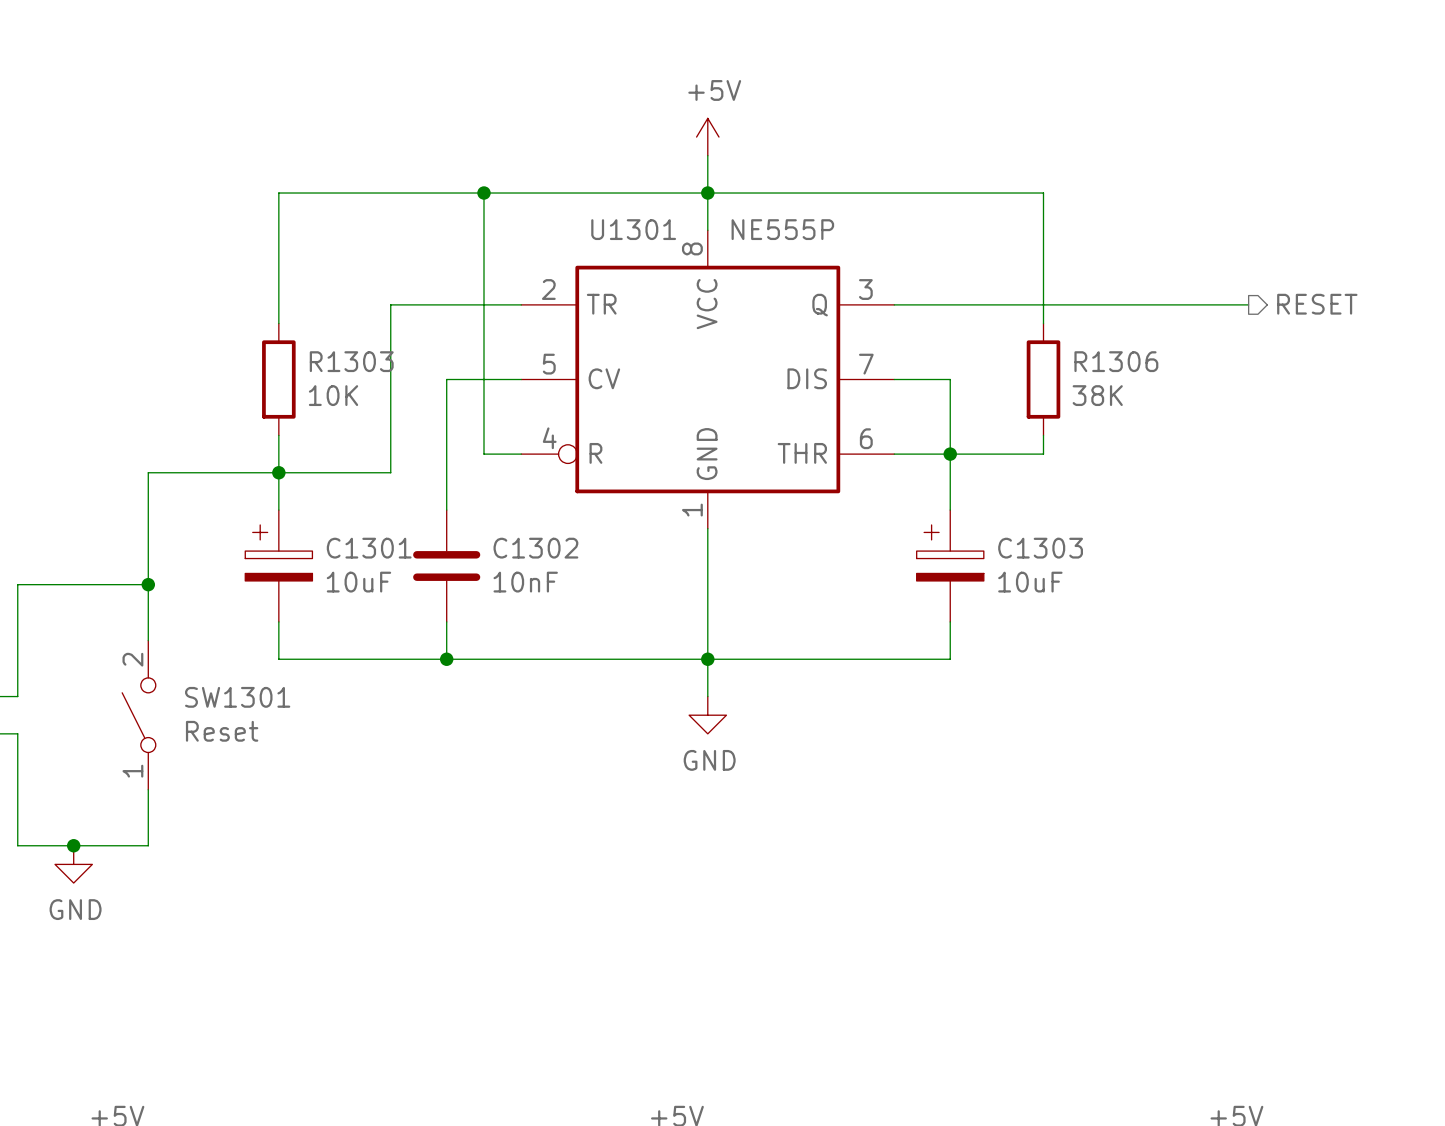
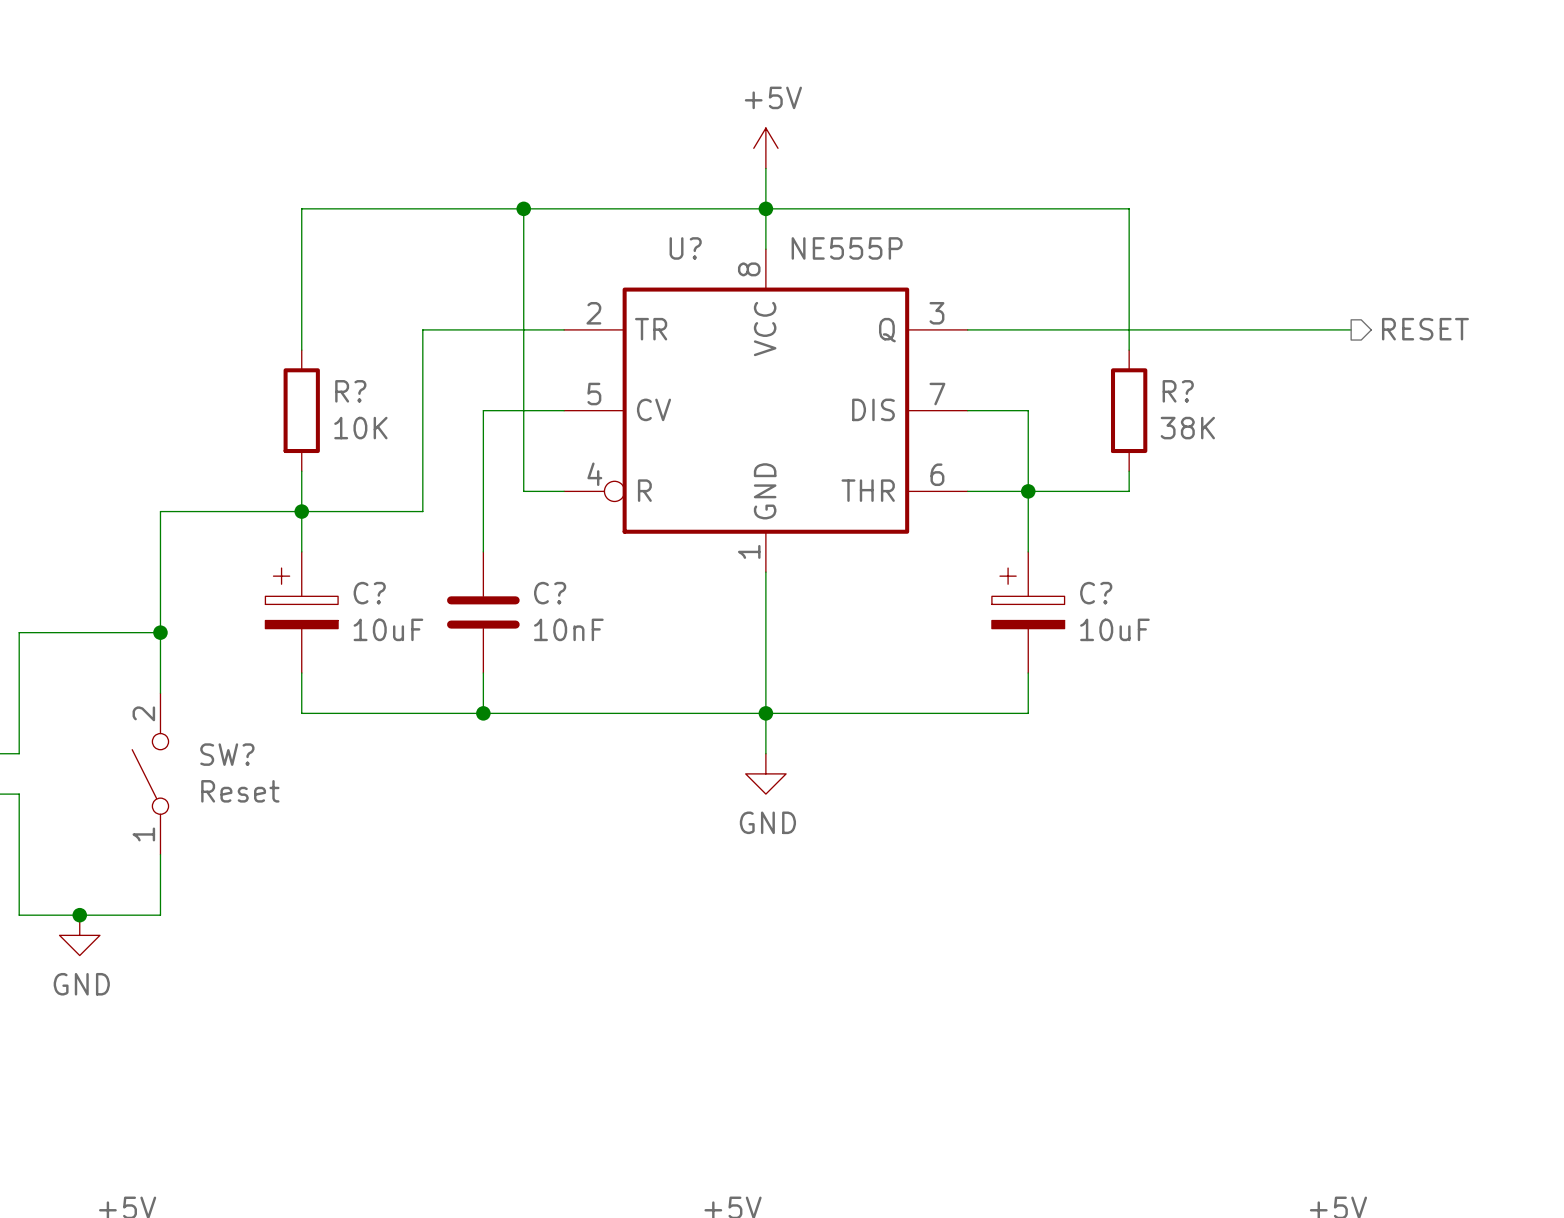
U1301 name: U1301 (633, 229) -> U? (685, 248)
R1303 name: R1303 (351, 361) -> R? (350, 391)
R1306 name: R1306 (1116, 361) -> R? (1178, 391)
C1301 name: C1301 (369, 548) -> C? (369, 593)
C1302 name: C1302 (535, 548) -> C? (550, 593)
C1303 name: C1303 (1040, 548) -> C? (1096, 593)
SW1301 name: SW1301 (237, 697) -> SW? (227, 754)

